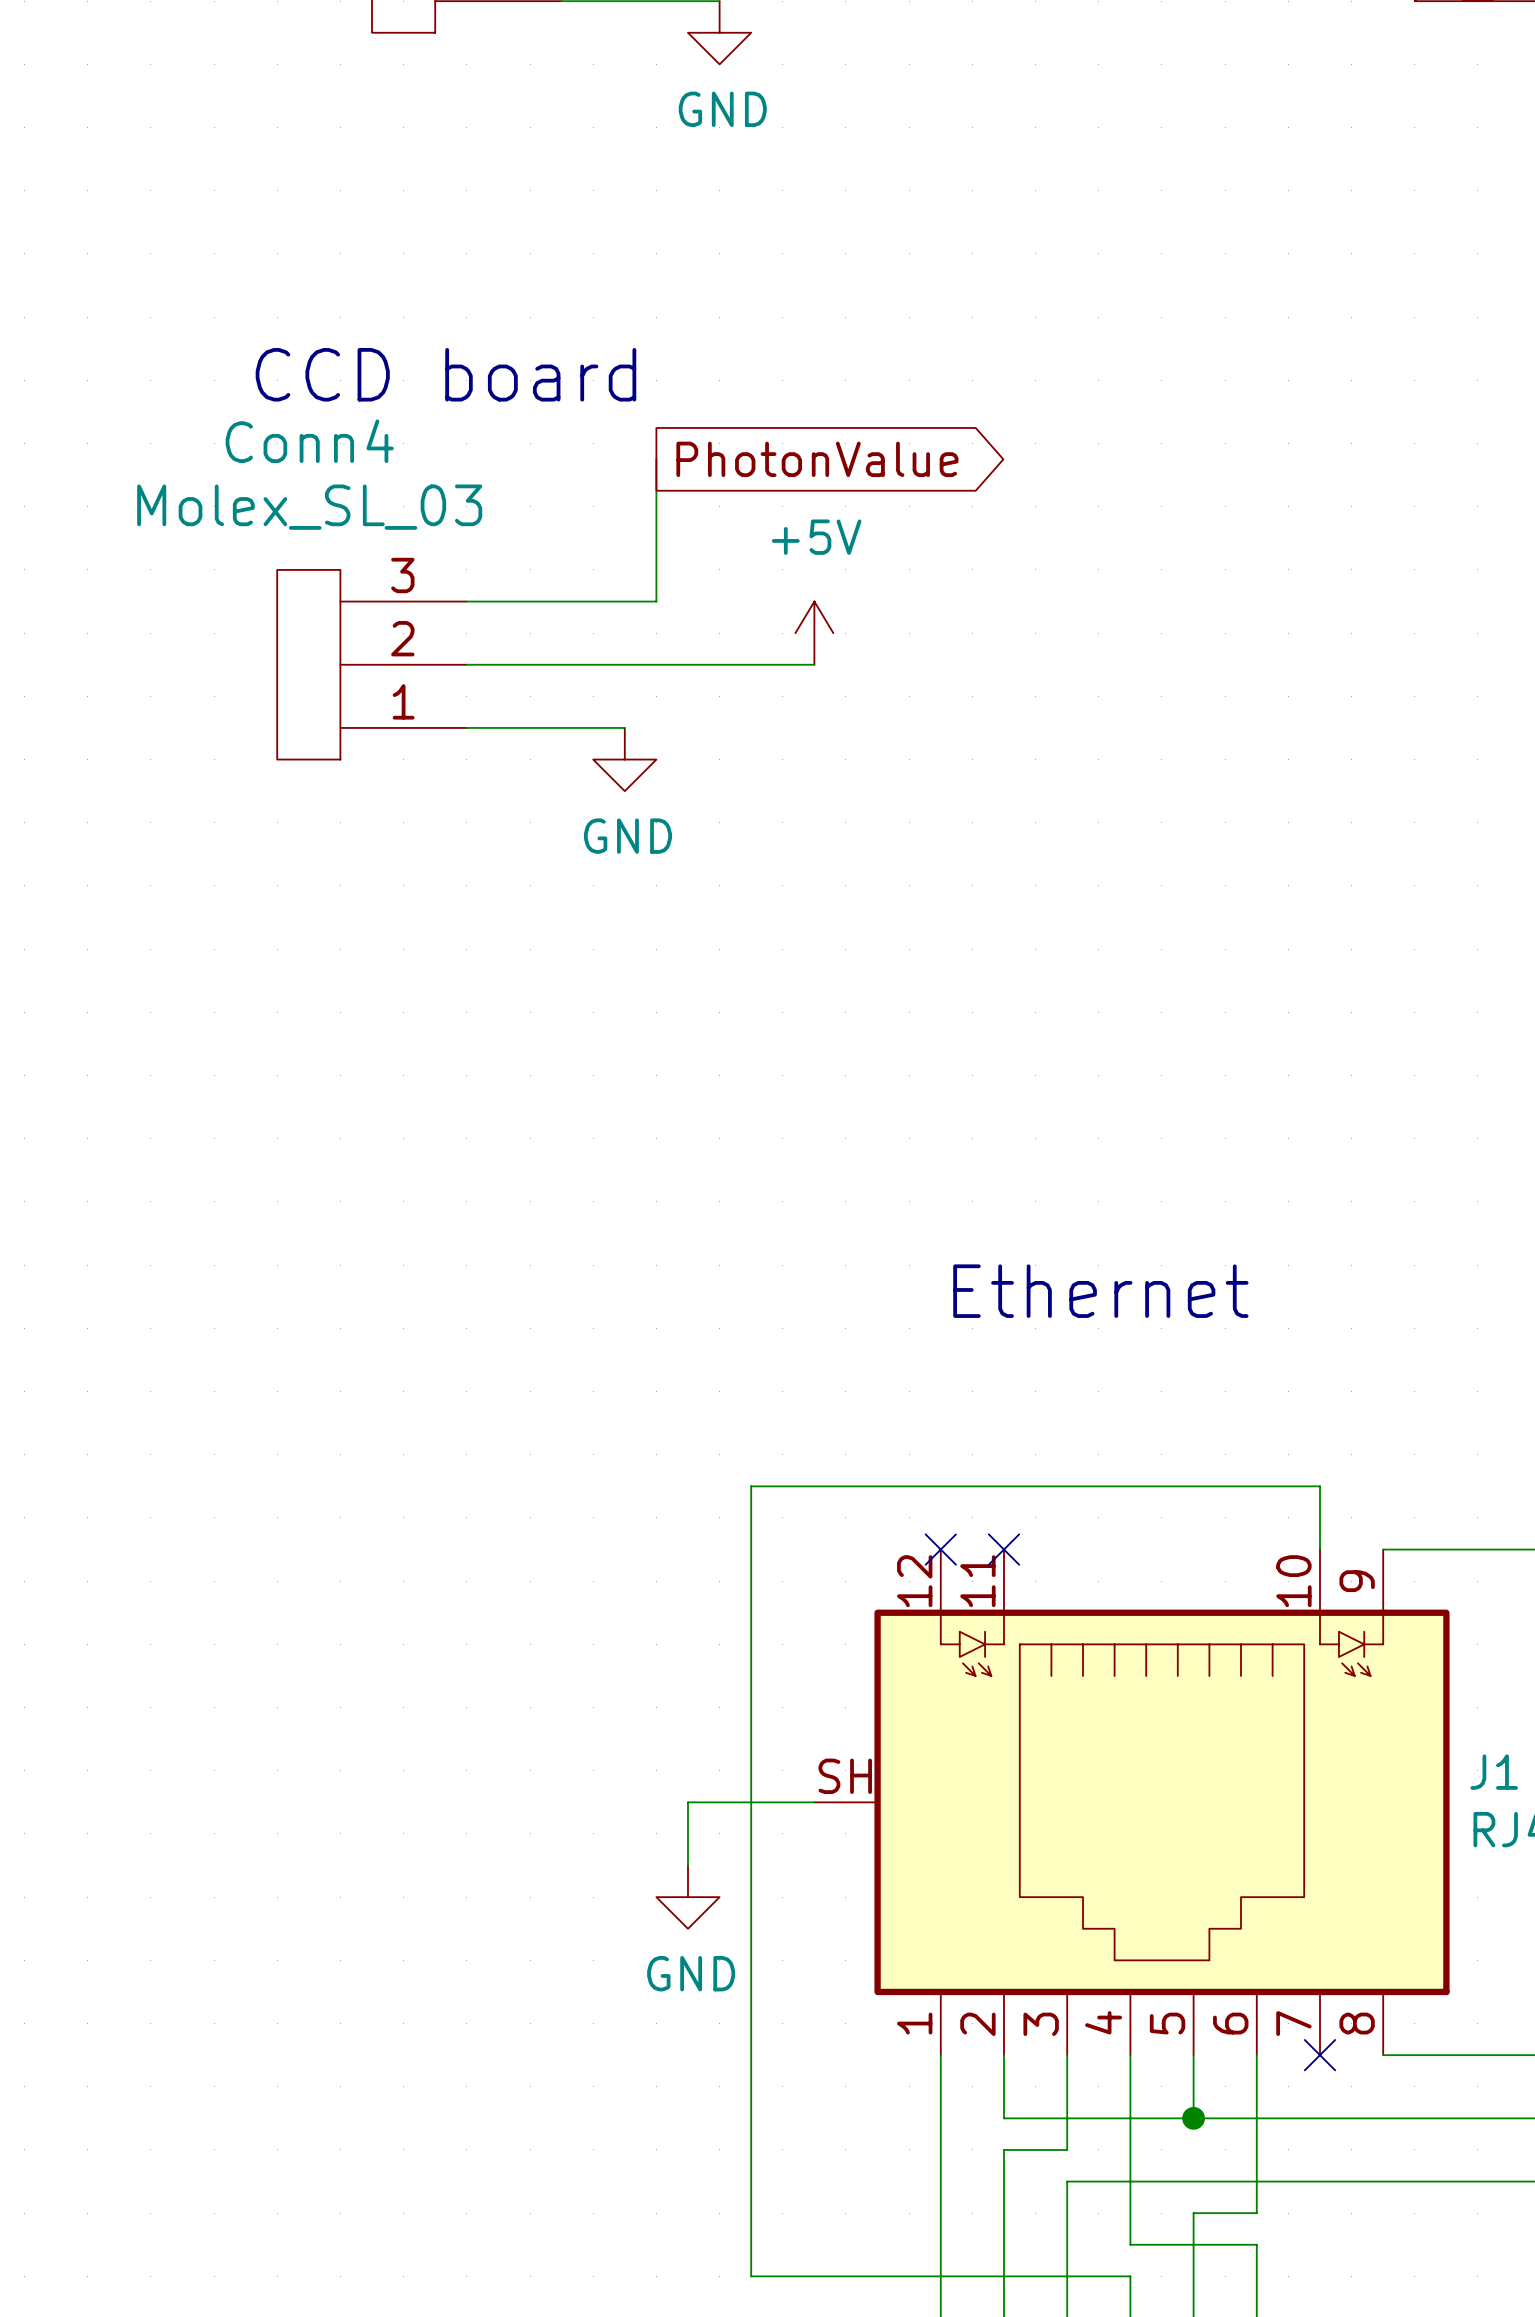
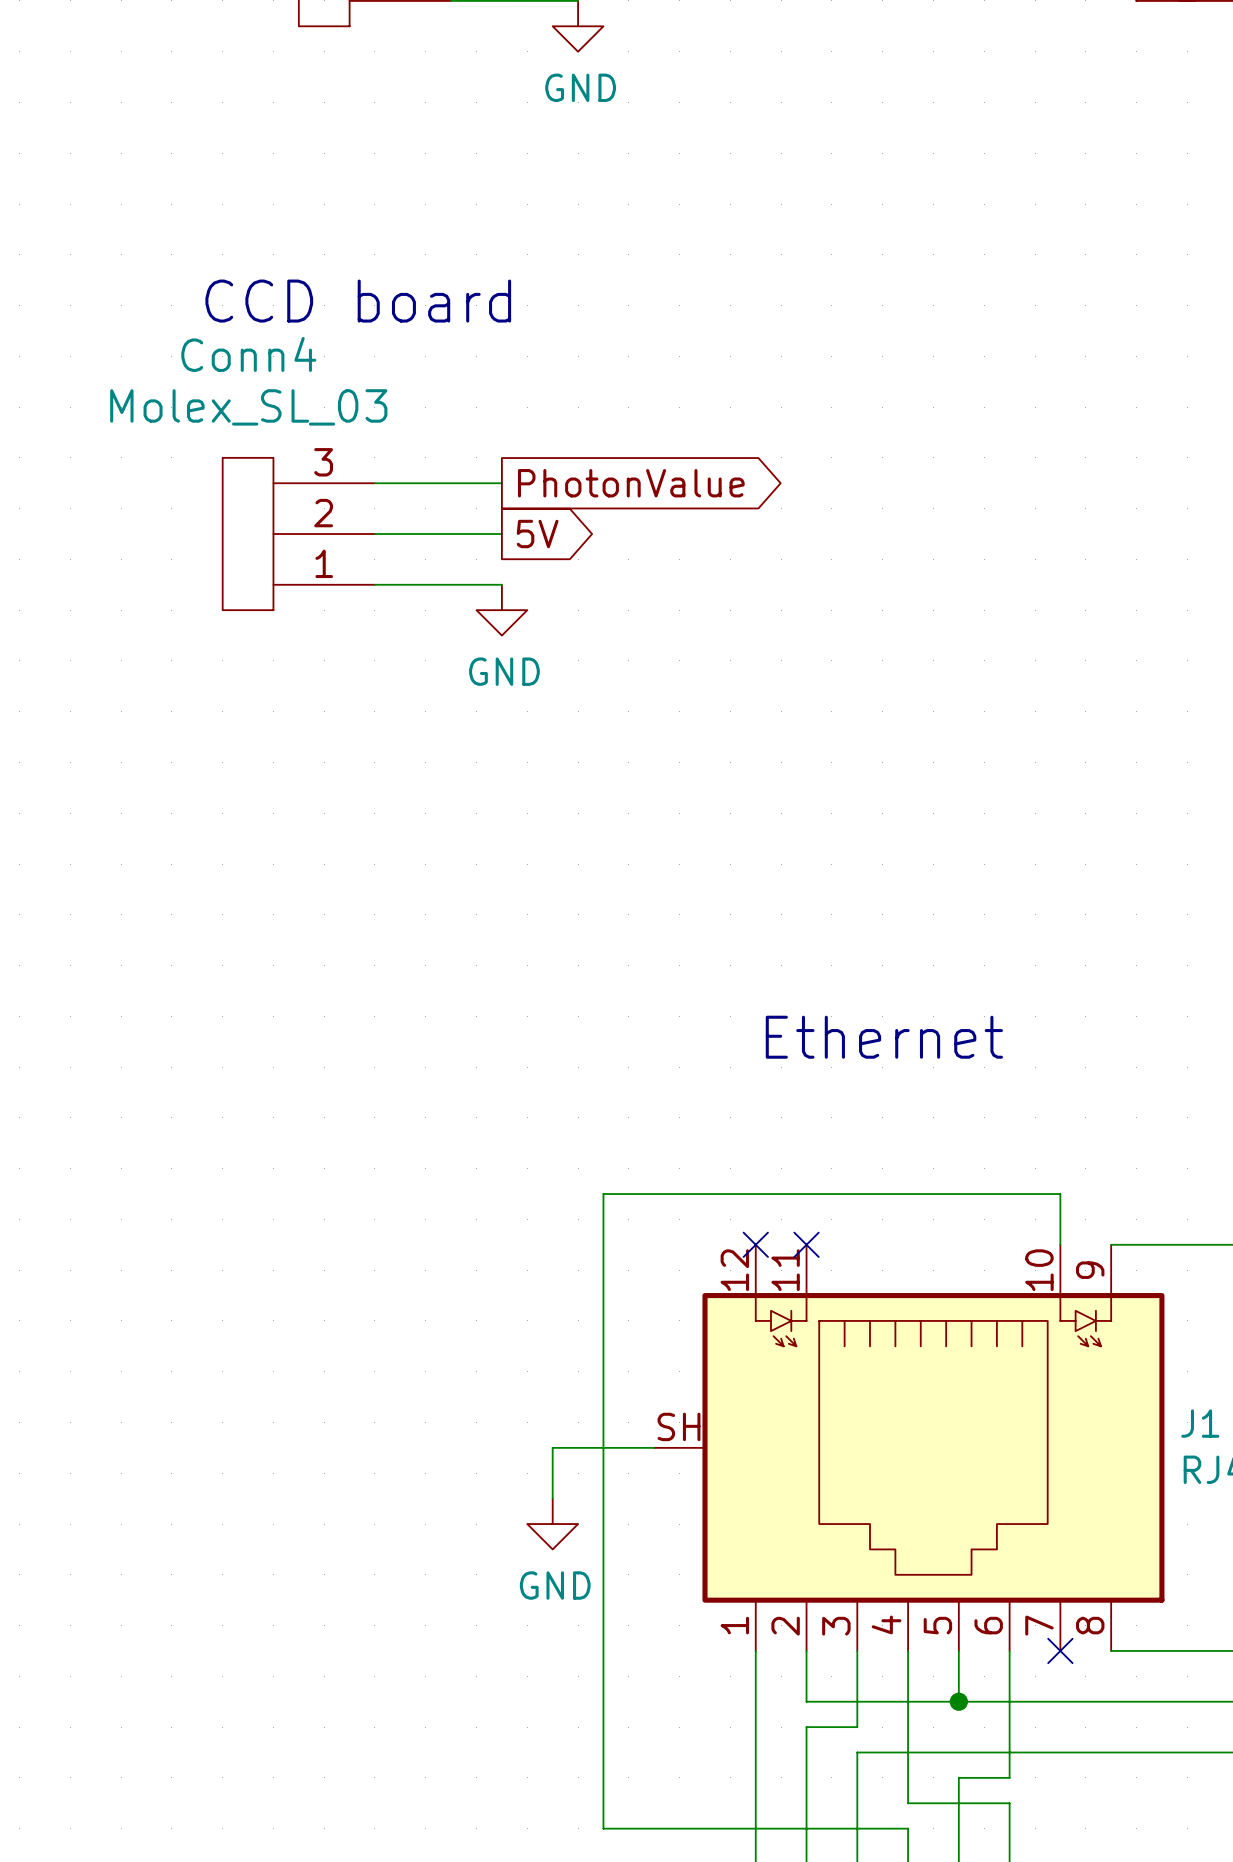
wire: (656, 459) (656, 601) (624, 601) -> none
global label position: PhotonValue (817, 459) -> PhotonValue (631, 483)
power symbol: +5V (814, 633) -> none
wire: (624, 664) (814, 664) -> none
global label: none -> 5V (537, 534)

